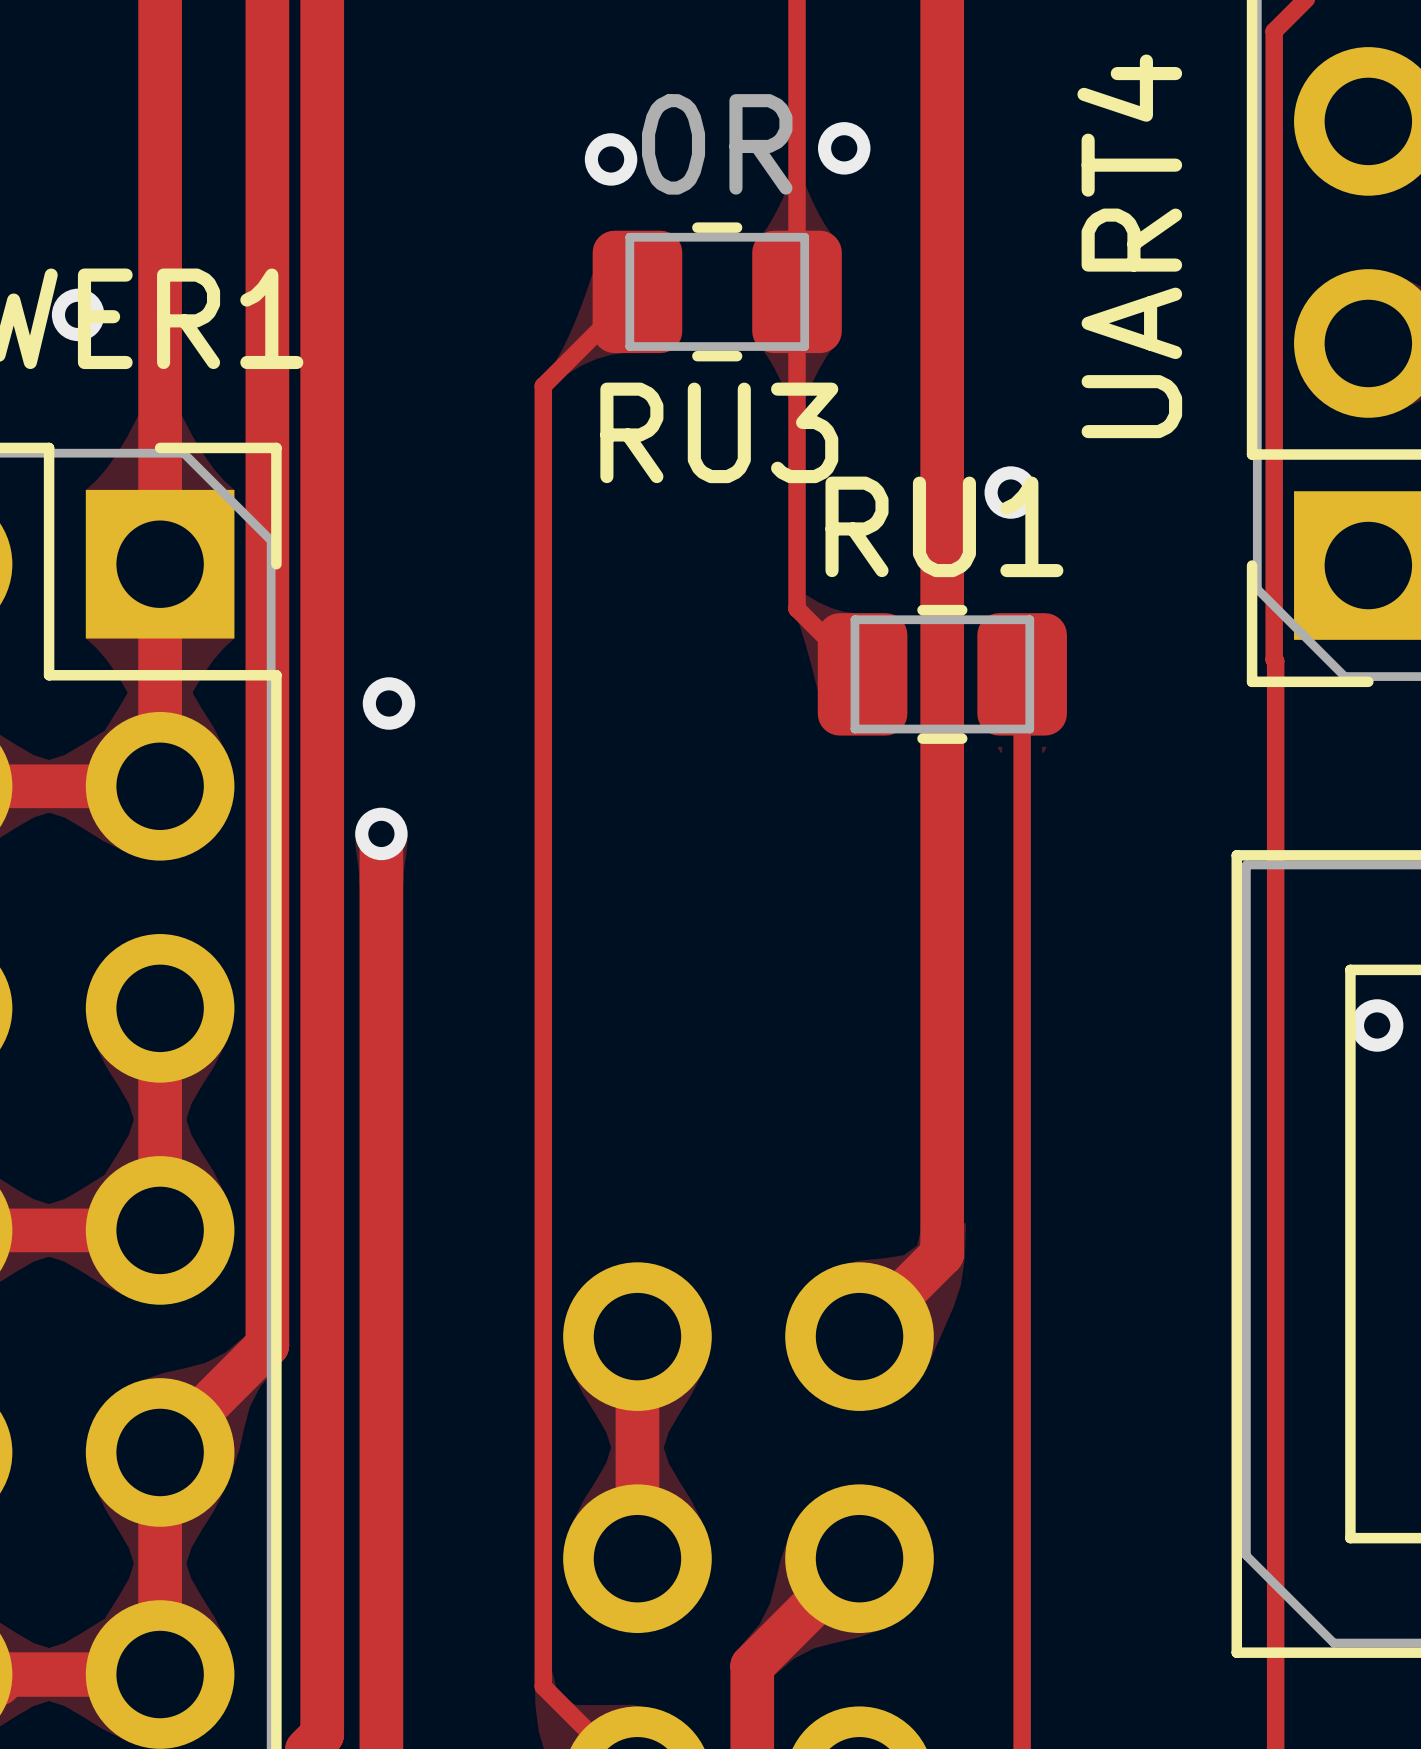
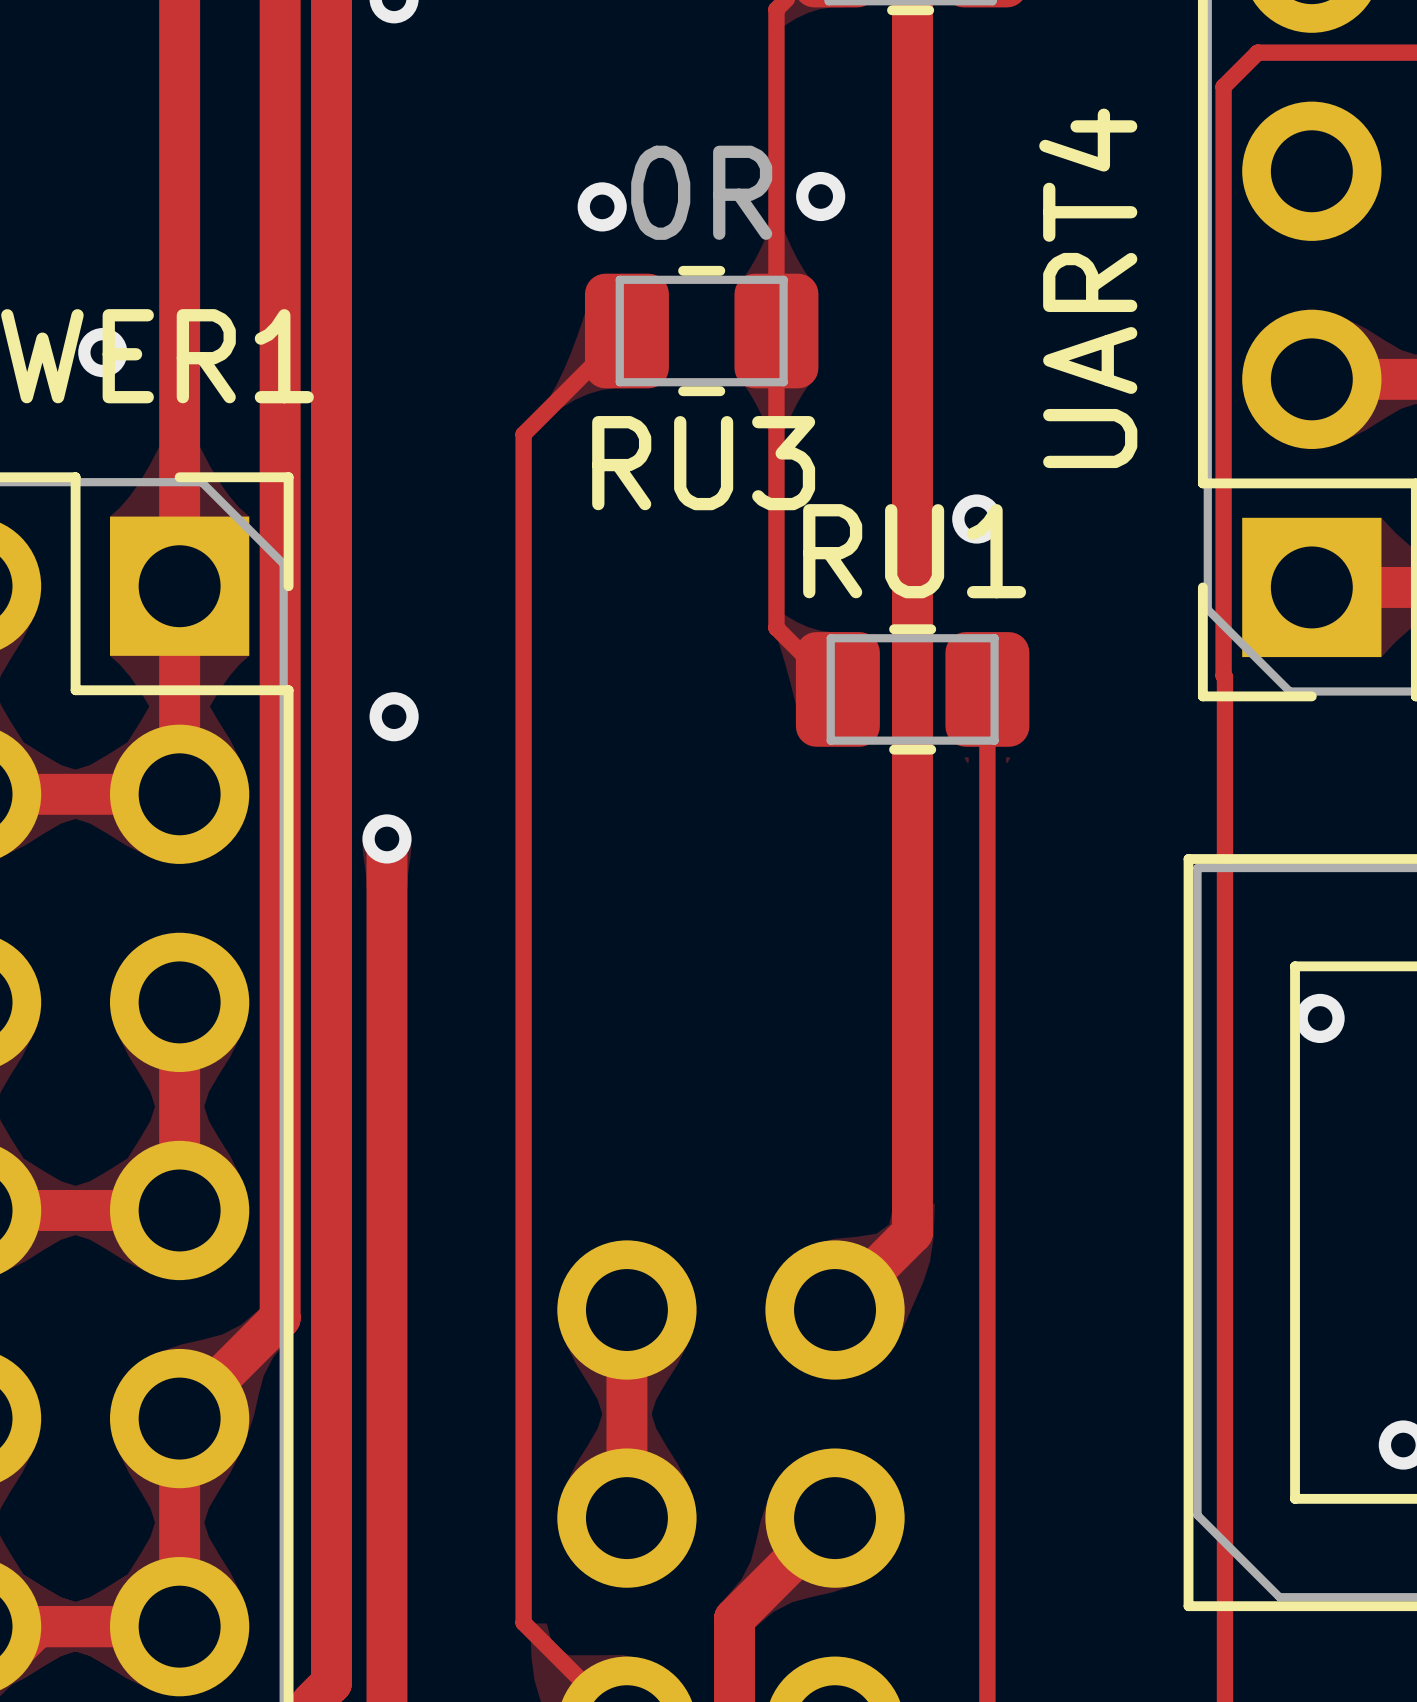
track: (543, 386) (543, 1686) -> (538, 419) (523, 434) (523, 1622) (538, 1637)

